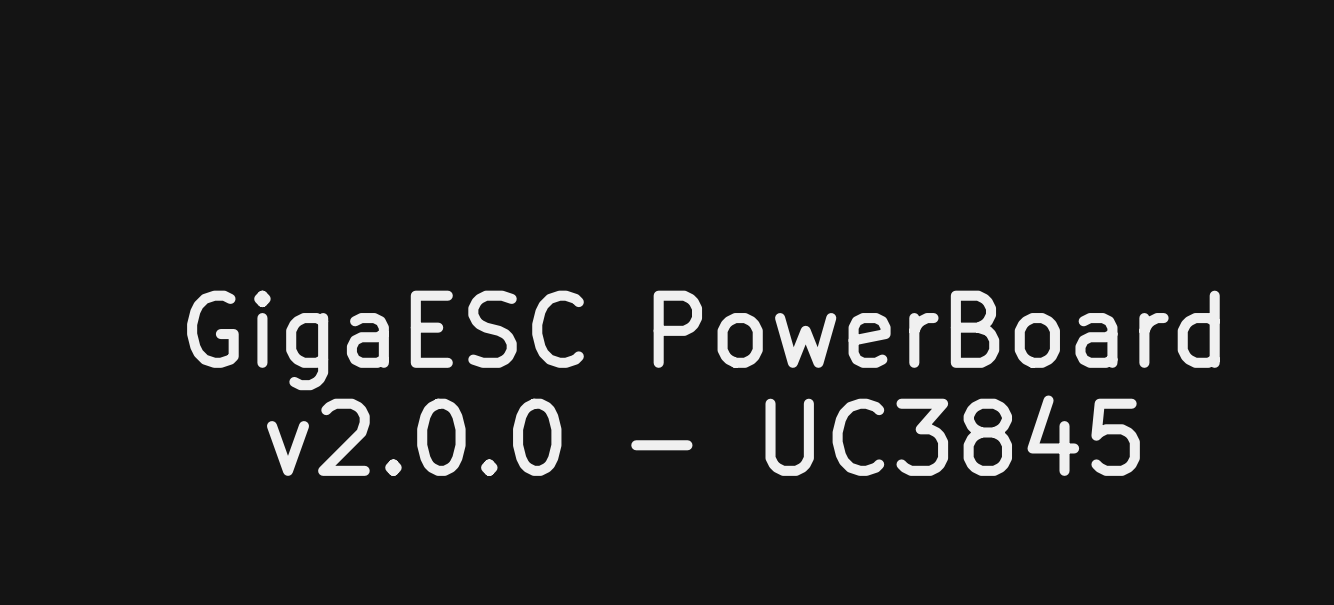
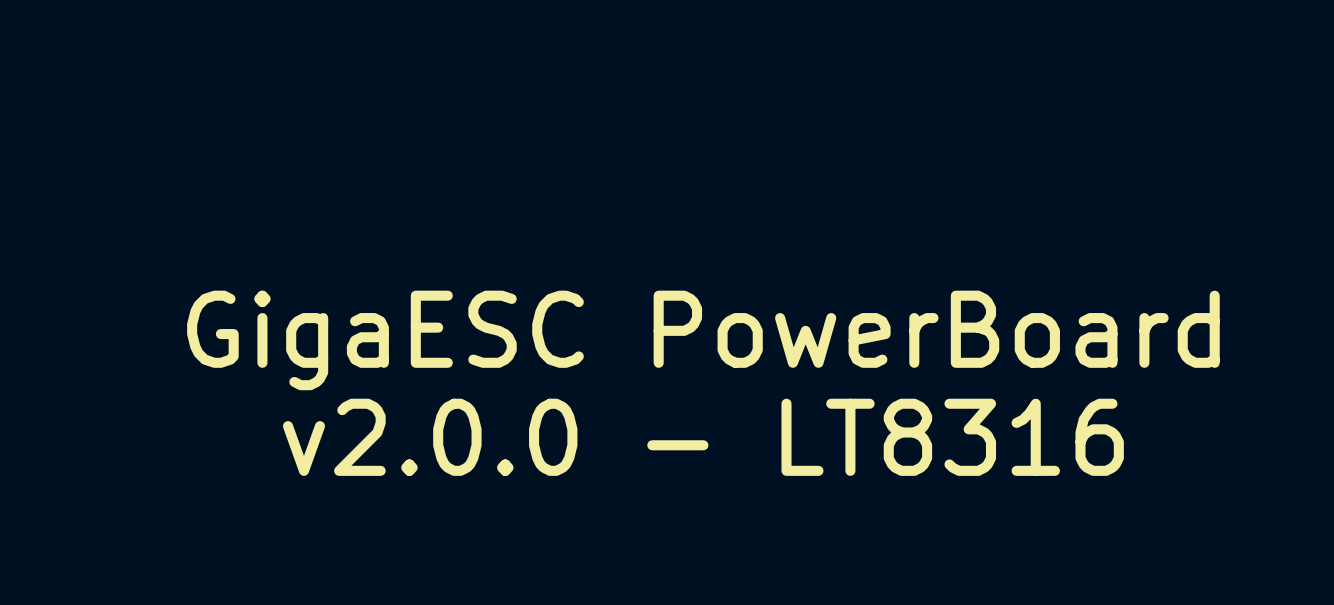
text: v2.0.0 - UC3845 (703, 435) -> v2.0.0 - LT8316 (703, 437)

